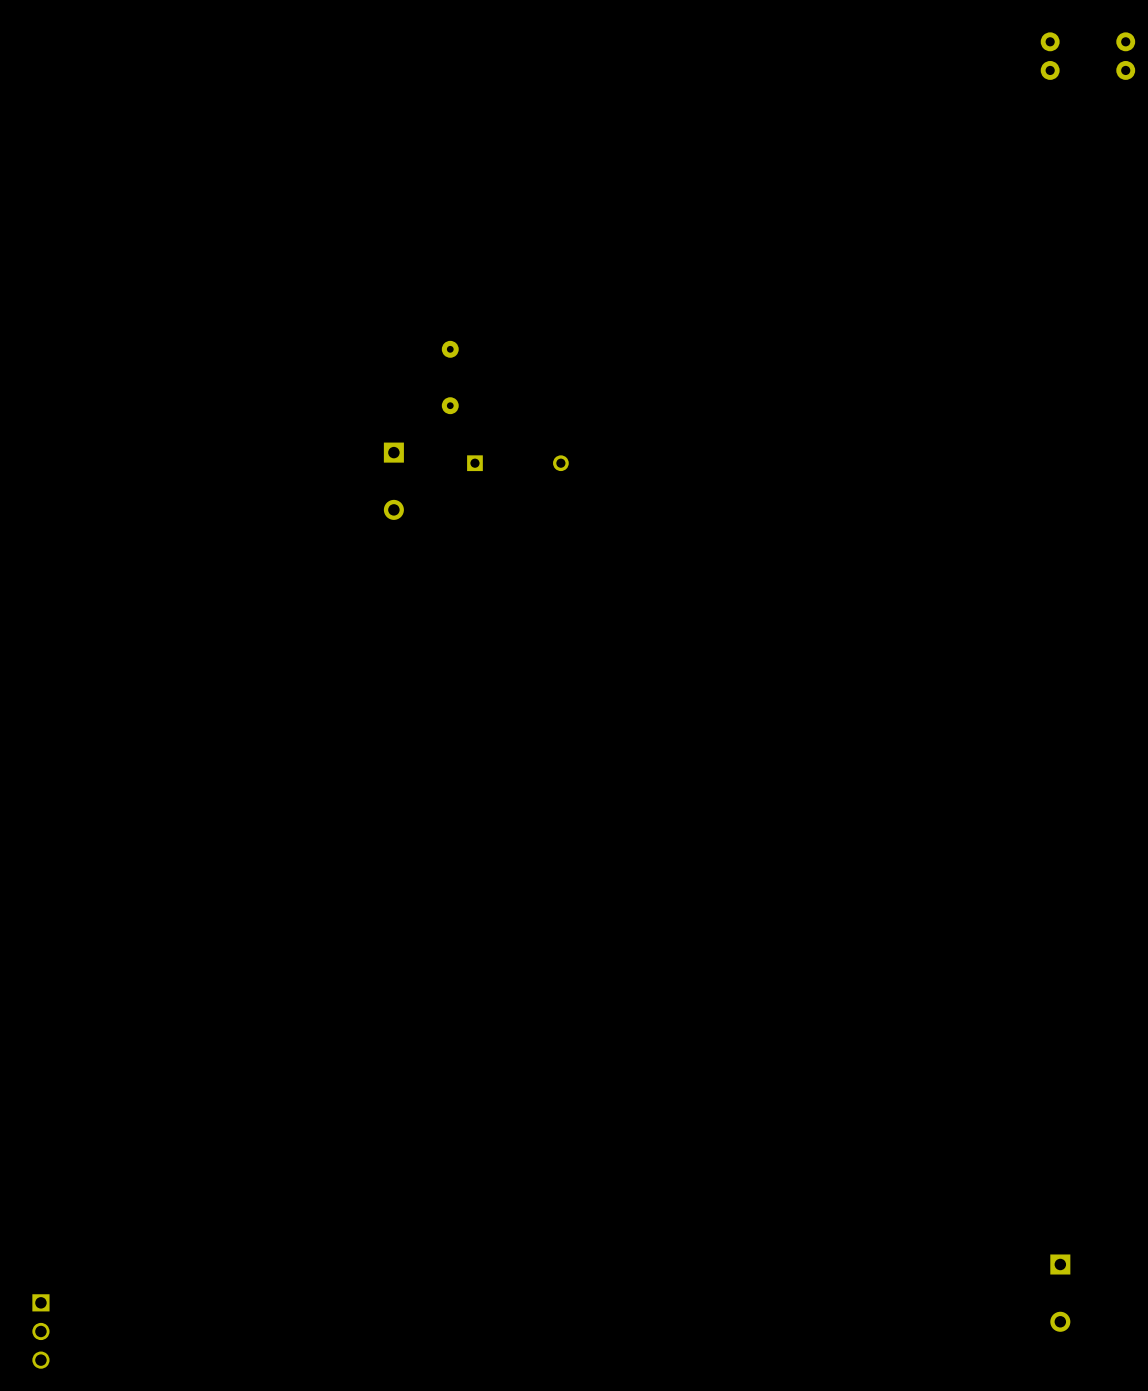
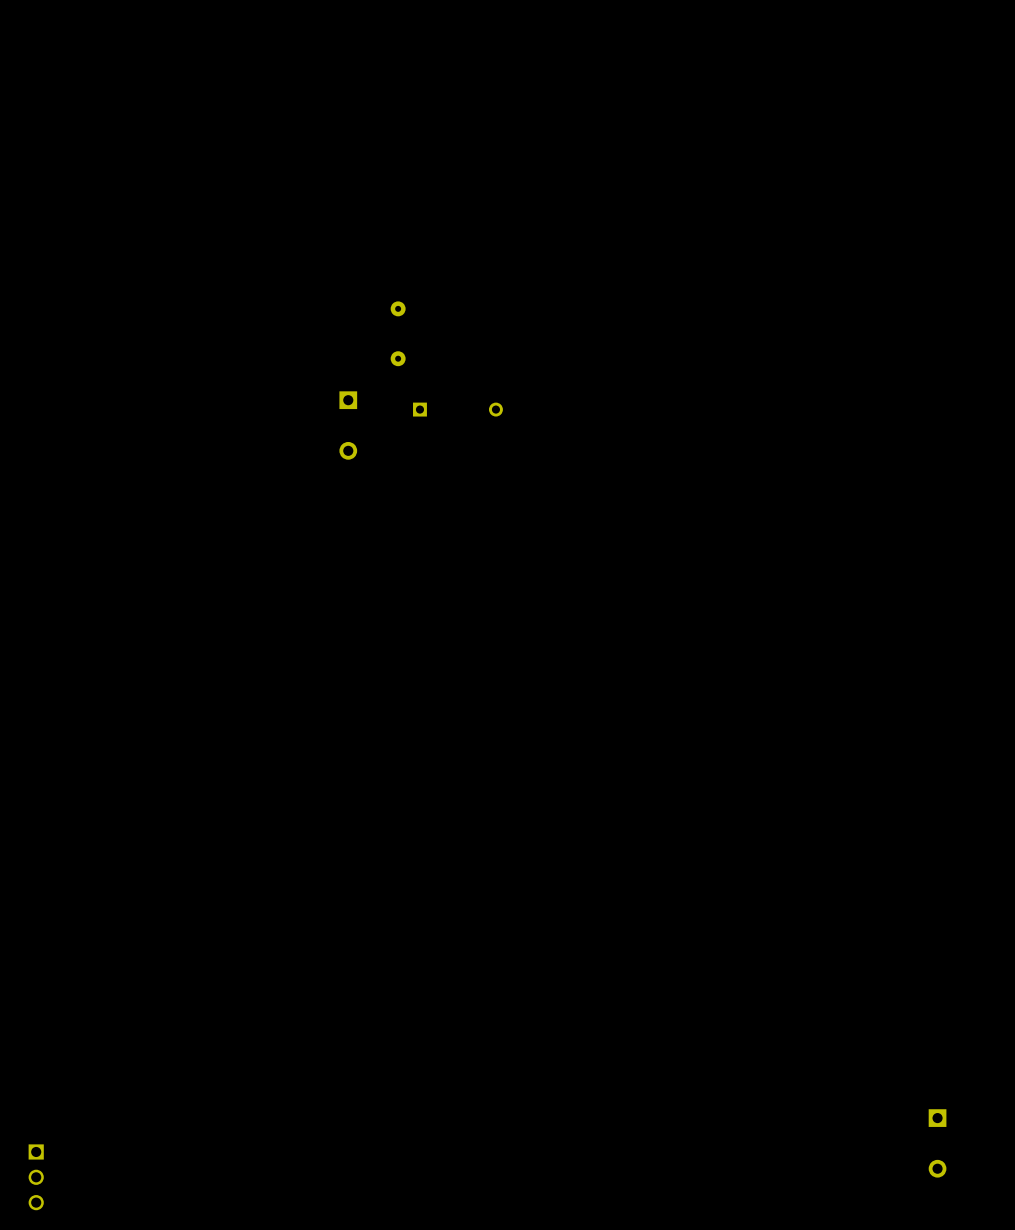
part: (1050, 56) -> none
part: (1125, 56) -> none

